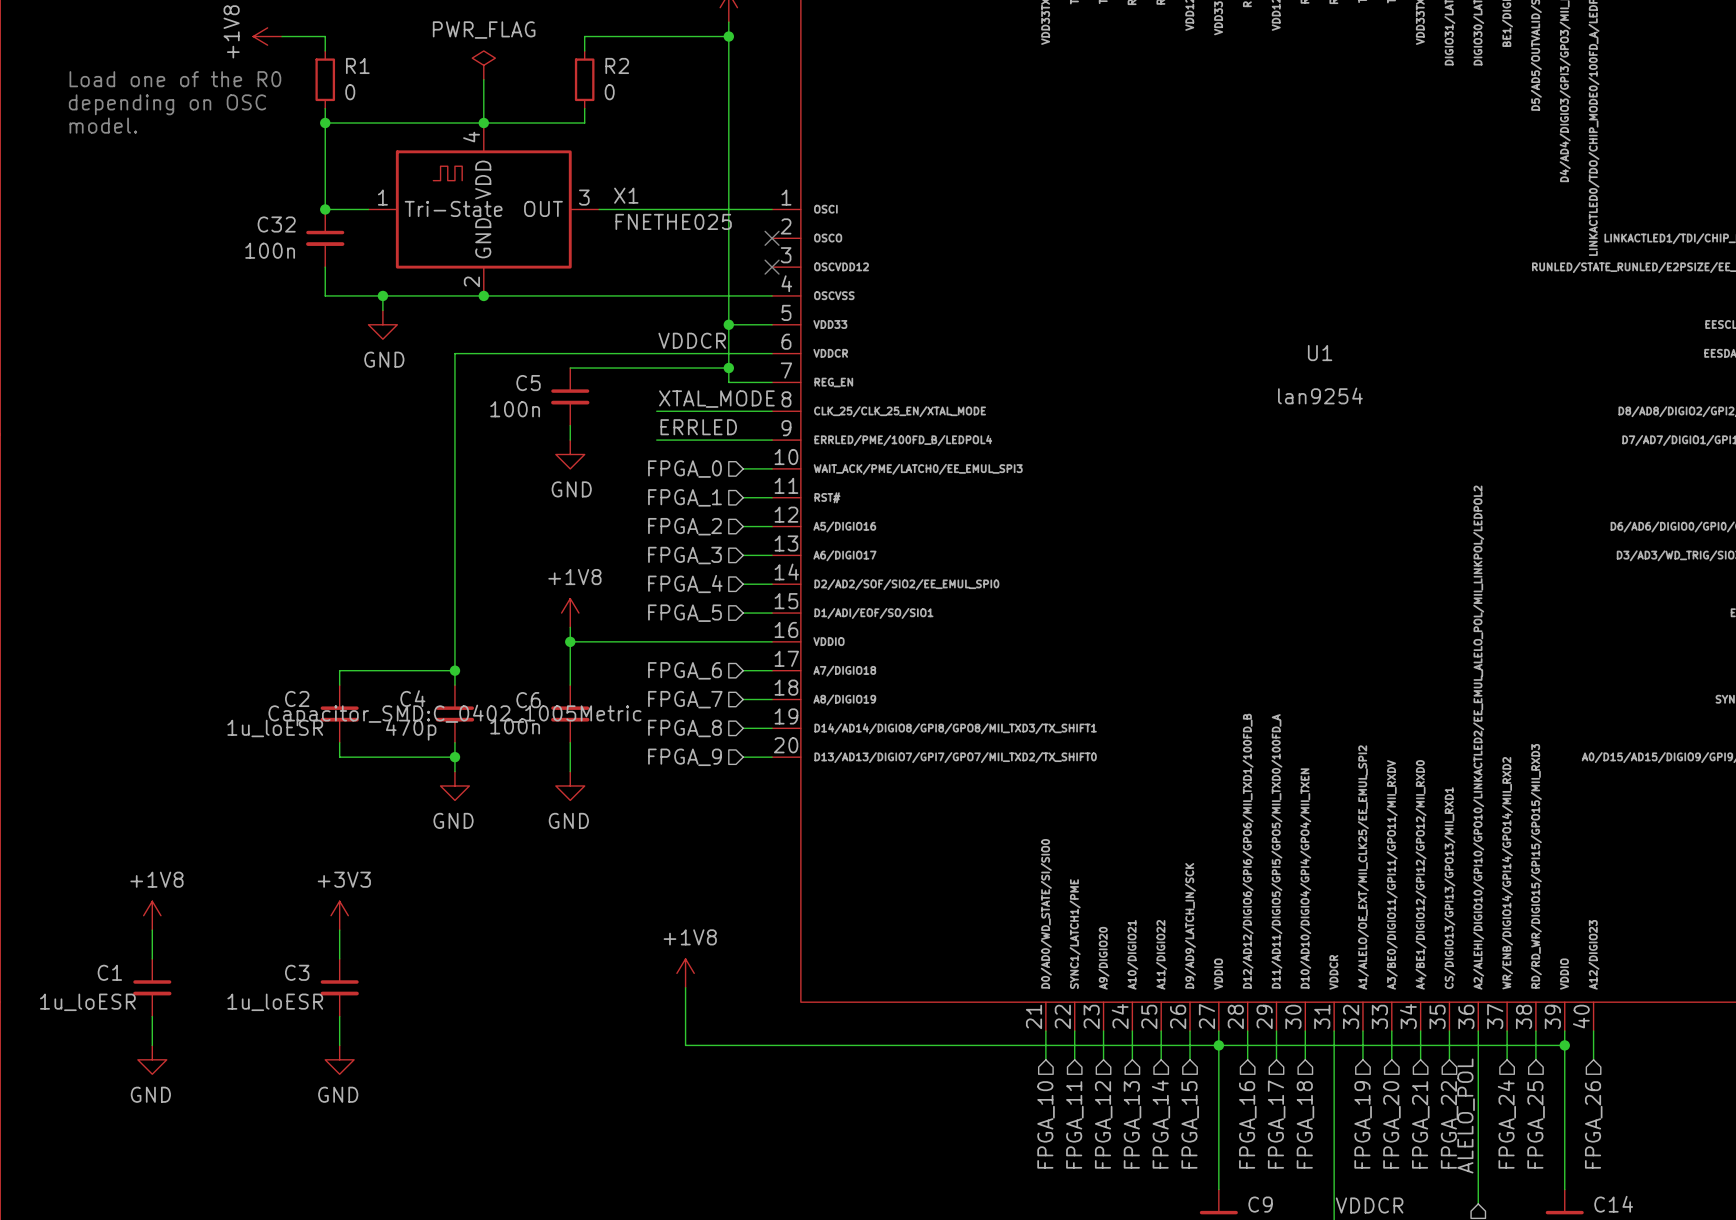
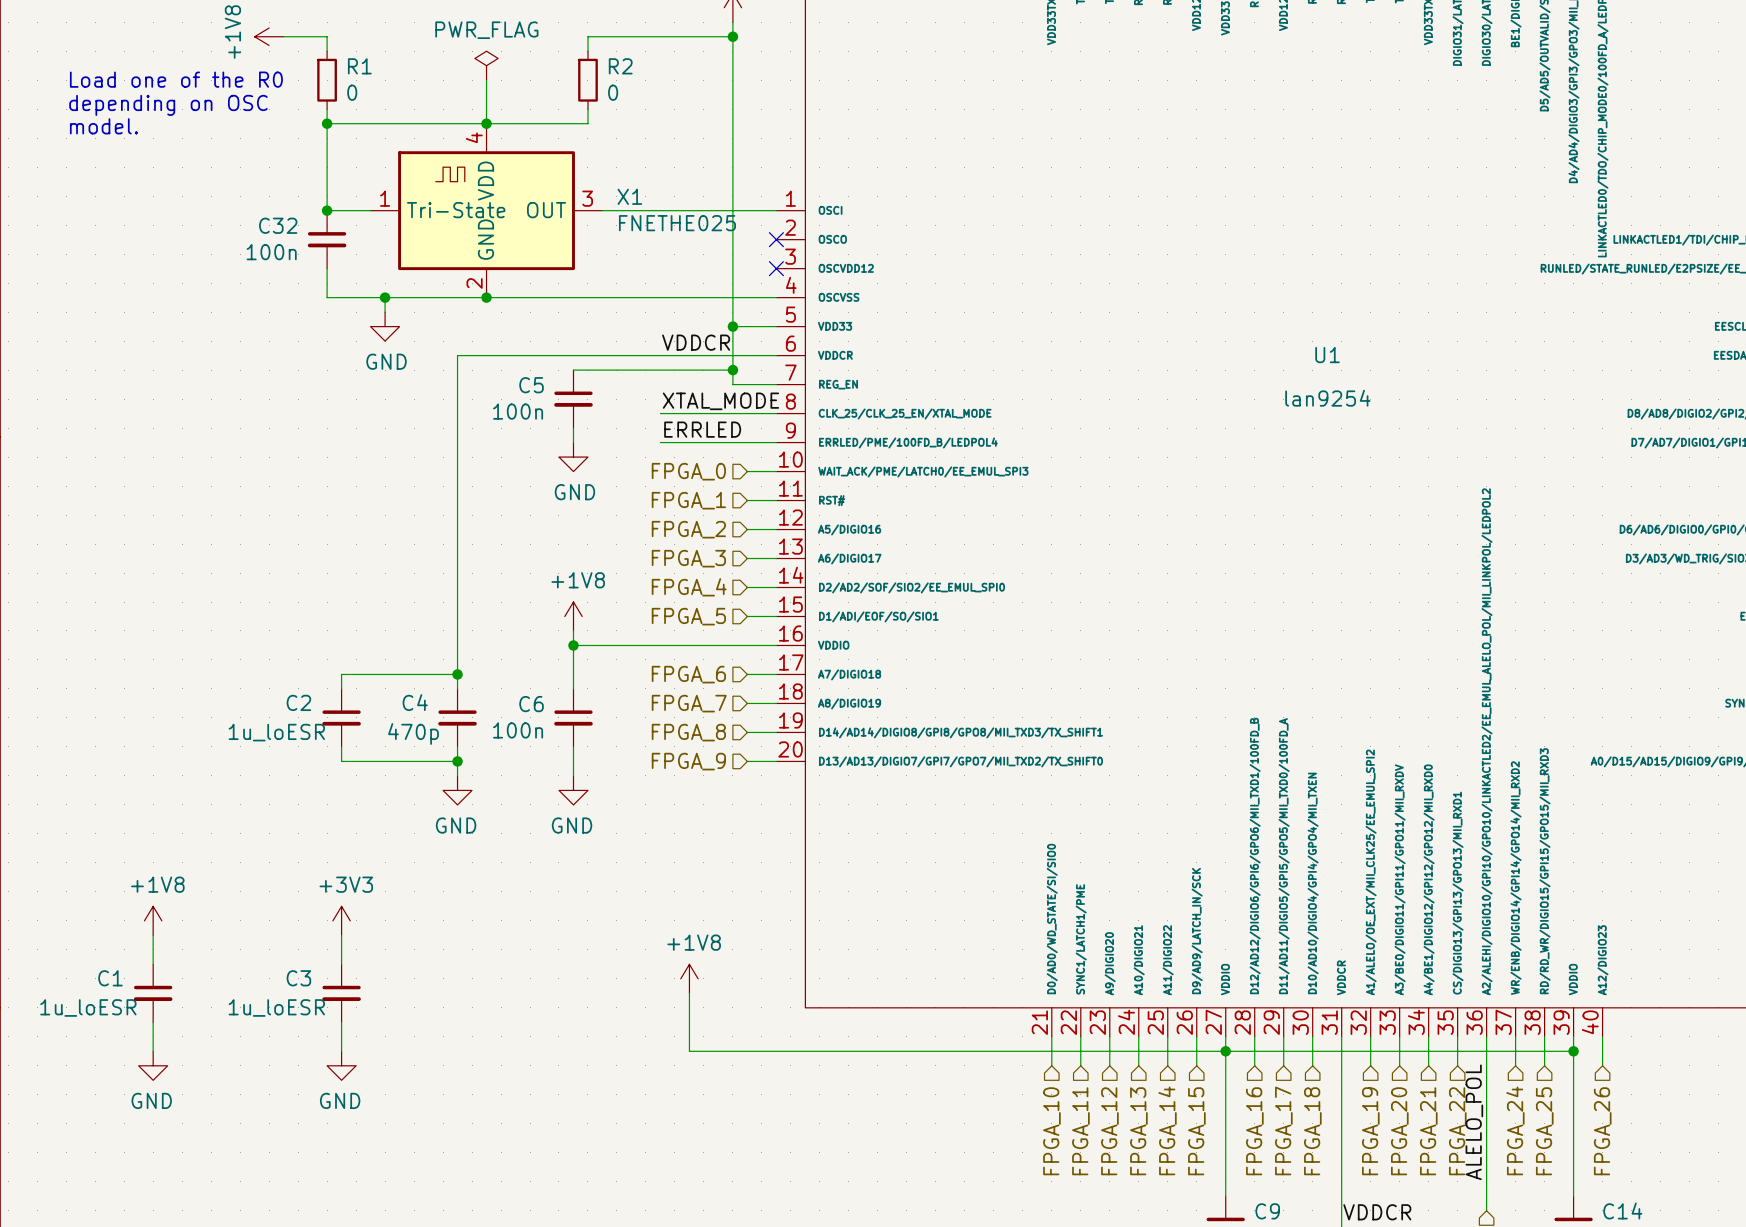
C4 text: Capacitor_SMD:C_0402_1005Metric (454, 715) -> none

